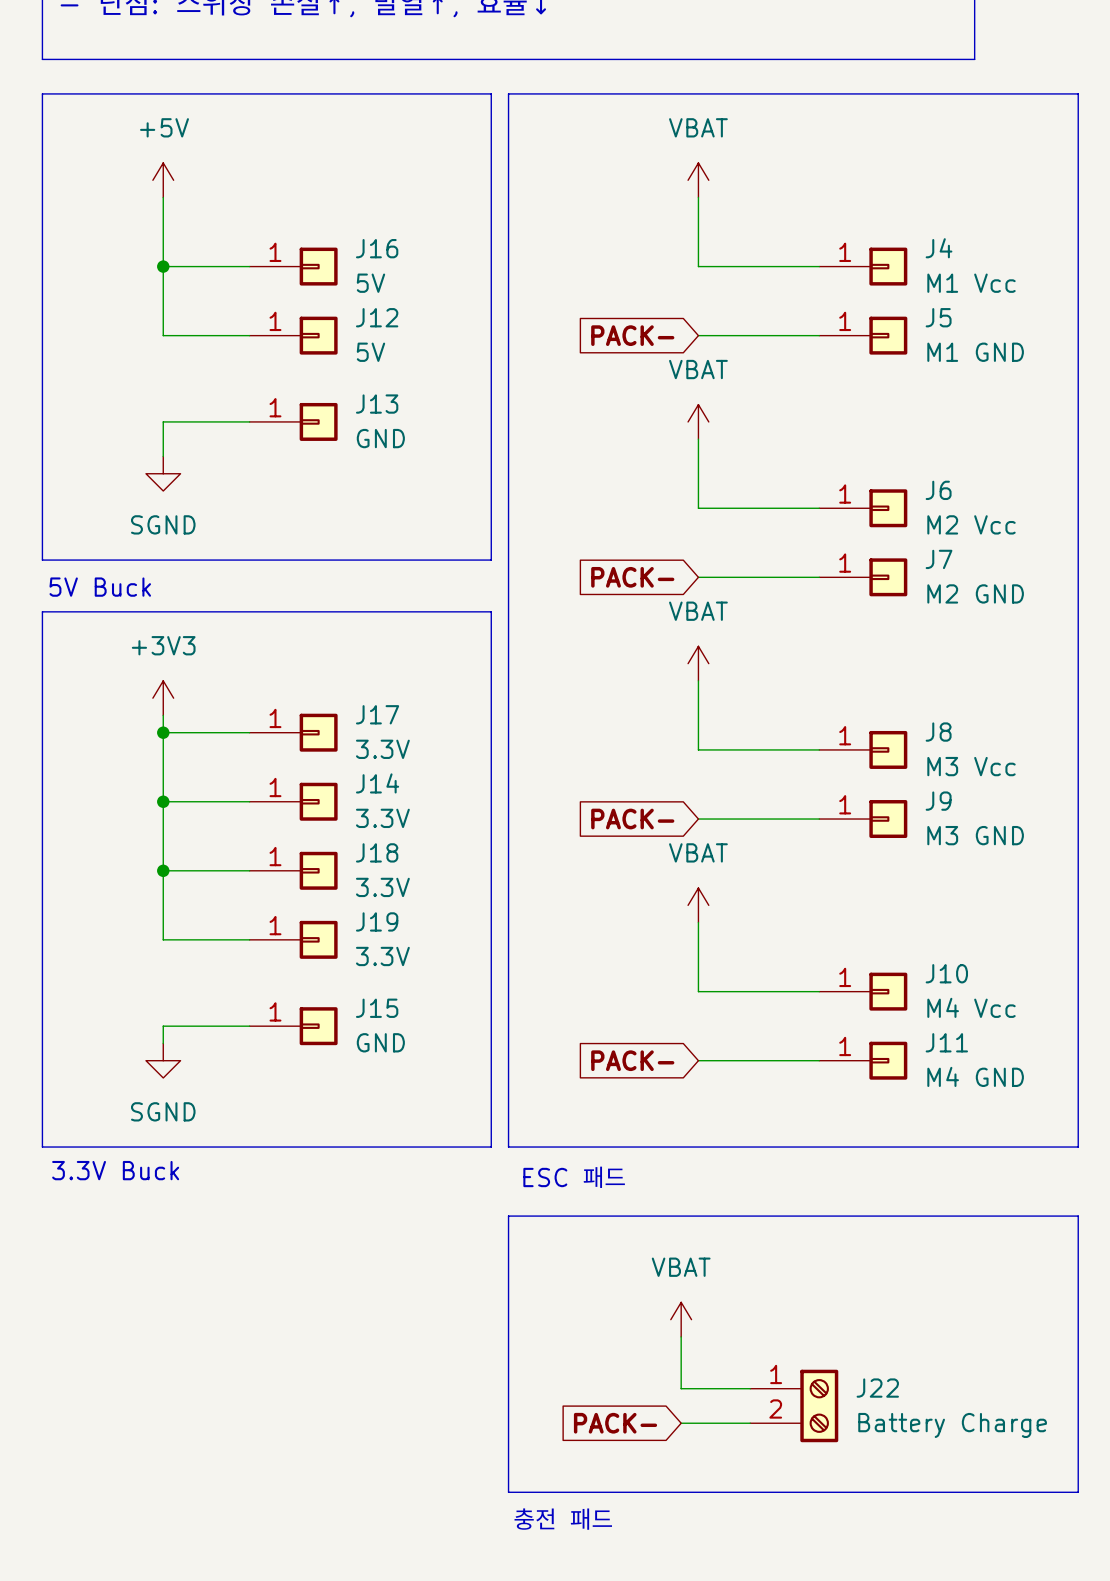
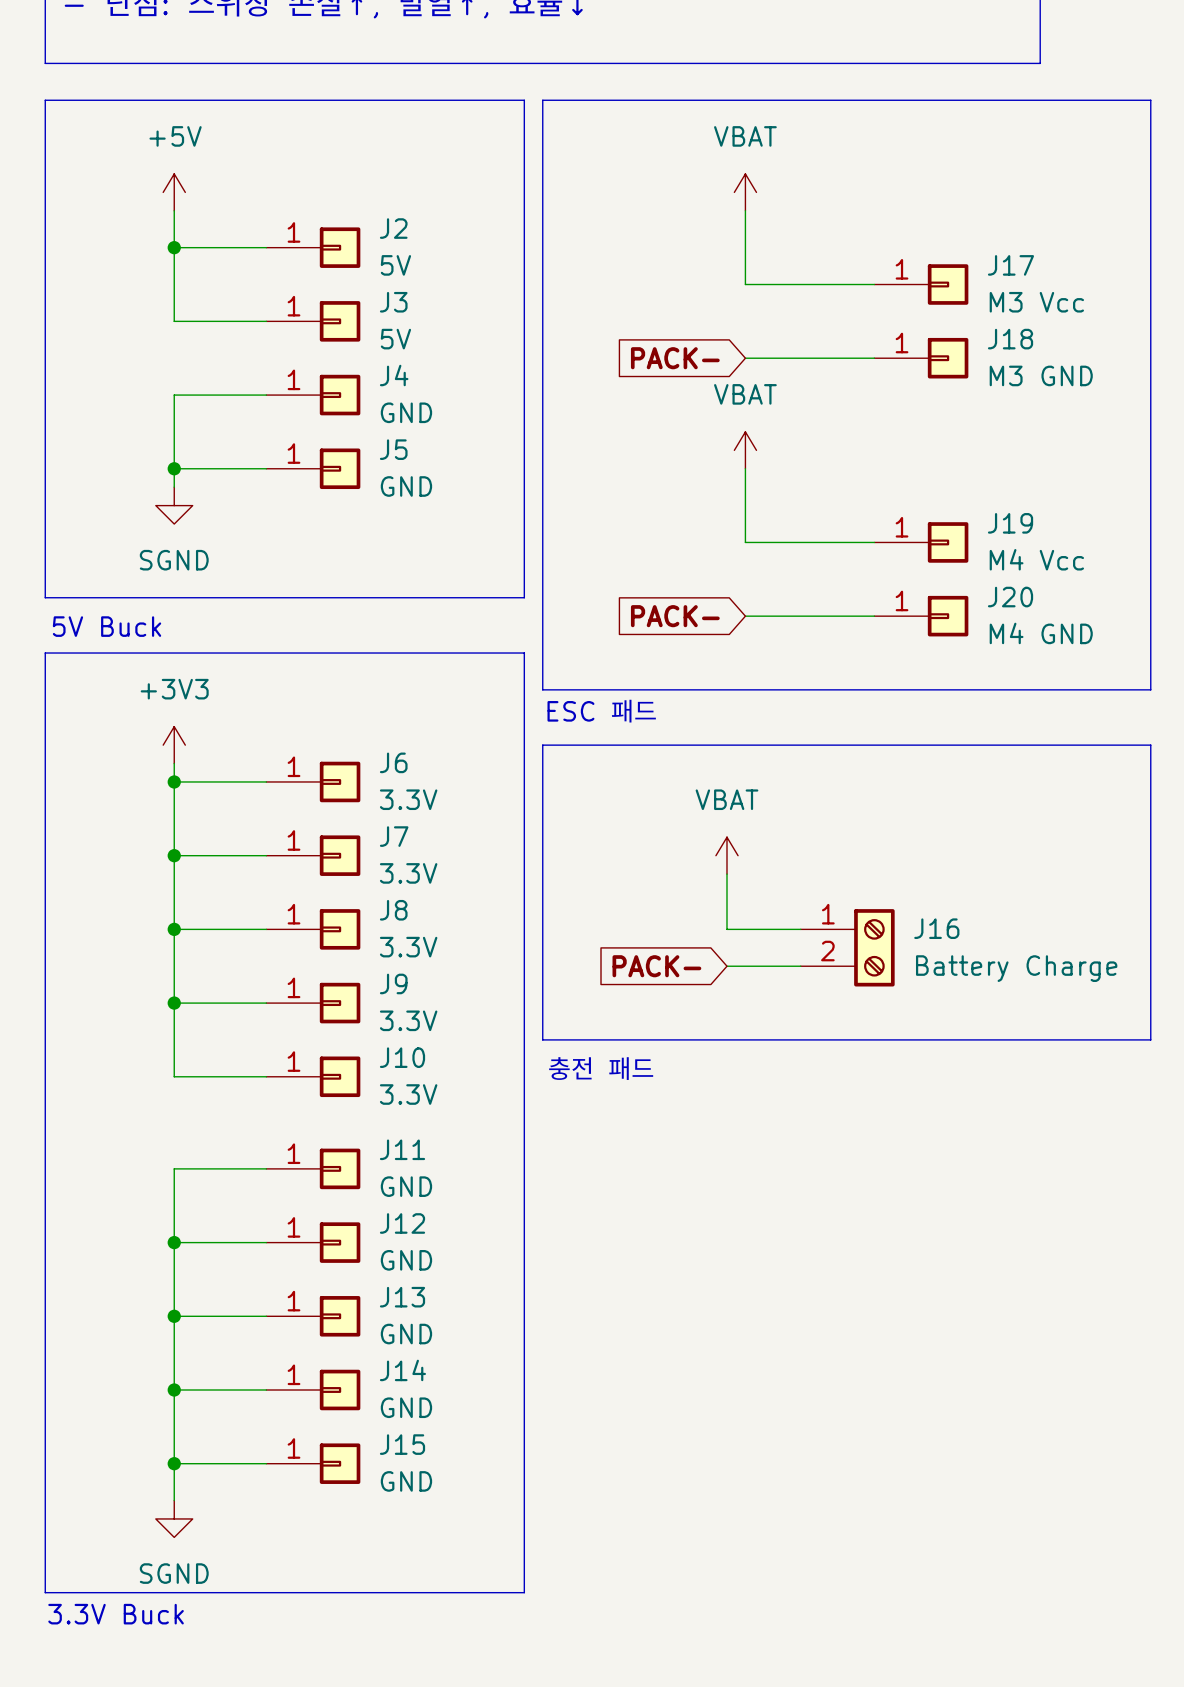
J2: none -> 5V (313, 247)
J16 symbol: [249, 247, 338, 286] -> [800, 909, 895, 987]
J4 name: J4 (939, 248) -> J17 (1010, 265)
wire: (163, 266) (249, 266) -> (174, 247) (266, 247)
junction position: (163, 266) -> (174, 247)
J16 value: 5V (370, 283) -> Battery Charge (1016, 968)
J4 value: M1 Vcc (971, 283) -> M3 Vcc (1036, 302)
wire: (163, 301) (163, 335) (249, 335) -> (174, 321) (266, 321)
J3: none -> 5V (313, 321)
J5 name: J5 (938, 317) -> J18 (1010, 339)
J12 position: (293, 335) -> (313, 1242)
J12 value: 5V (370, 352) -> GND (406, 1260)
J5 value: M1 GND (975, 352) -> M3 GND (1041, 375)
J4: none -> GND (313, 395)
wire: (163, 421) (249, 421) -> (174, 450) (174, 395) (266, 395)
J13 position: (293, 421) -> (313, 1316)
wire: none -> (174, 468) (266, 468)
junction: none -> (174, 468)
J5: none -> GND (313, 468)
J6 name: J6 (938, 490) -> J19 (1010, 523)
J6 value: M2 Vcc (971, 524) -> M4 Vcc (1036, 559)
J7 name: J7 (939, 559) -> J20 (1010, 597)
J7 value: M2 GND (975, 593) -> M4 GND (1041, 633)
line: (508, 646) (508, 698) -> (542, 689) (1150, 689)
line: (1078, 646) (1078, 698) -> (542, 745) (1150, 745)
power symbol: VBAT (698, 663) -> none
text: none -> ESC 패드 (602, 711)
wire: (698, 680) (698, 749) (819, 749) -> none
J17 name: J17 (377, 714) -> J6 (393, 762)
J8: M3 Vcc (863, 749) -> none
J14 name: J14 (377, 783) -> J7 (394, 836)
power symbol: none -> VBAT (726, 855)
global label: PACK- (632, 819) -> none
wire: none -> (726, 874) (726, 929) (800, 929)
wire: (698, 819) (819, 819) -> none
J9: M3 GND (863, 819) -> none
J18 name: J18 (377, 852) -> J8 (393, 910)
global label: none -> PACK- (656, 966)
wire: none -> (726, 966) (800, 966)
power symbol: VBAT (698, 905) -> none
J19 name: J19 (377, 921) -> J9 (393, 983)
wire: (698, 922) (698, 991) (819, 991) -> none
wire: none -> (174, 1003) (174, 1076) (266, 1076)
junction: none -> (174, 1003)
line: (508, 974) (508, 1147) (1078, 1147) (1078, 974) -> (542, 1039) (1150, 1039)
J10 position: (863, 991) -> (313, 1076)
text: none -> 충전 패드 (601, 1068)
J10 value: M4 Vcc (971, 1007) -> 3.3V (408, 1094)
wire: (249, 1026) (163, 1026) (163, 1043) -> none
J15 position: (293, 1026) -> (313, 1463)
power symbol: SGND (163, 1060) -> none
global label: PACK- (632, 1060) -> none
wire: (698, 1060) (819, 1060) -> none
J11 position: (863, 1060) -> (313, 1168)
J11 value: M4 GND (975, 1076) -> GND (406, 1186)
wire: none -> (266, 1168) (174, 1168) (174, 1500)
line: (42, 1147) (491, 1147) -> (45, 1224) (45, 1592) (524, 1592) (524, 1224)
wire: none -> (174, 1242) (266, 1242)
junction: none -> (174, 1242)
text: 3.3V Buck (115, 1170) -> none
text: ESC 패드 (574, 1177) -> none
line: (508, 1216) (1078, 1216) (1078, 1492) (508, 1492) (508, 1216) -> none
wire: none -> (174, 1316) (266, 1316)
junction: none -> (174, 1316)
wire: none -> (174, 1390) (266, 1390)
junction: none -> (174, 1390)
J14: none -> GND (313, 1390)
power symbol: VBAT (681, 1319) -> none
wire: (681, 1336) (681, 1388) (750, 1388) -> none
wire: none -> (174, 1463) (266, 1463)
junction: none -> (174, 1463)
J22: Battery Charge (794, 1405) -> none
power symbol: none -> SGND (174, 1518)
global label: PACK- (615, 1423) -> none
wire: (681, 1423) (750, 1423) -> none
text: none -> 3.3V Buck (116, 1614)
text: 충전 패드 (563, 1519) -> none

